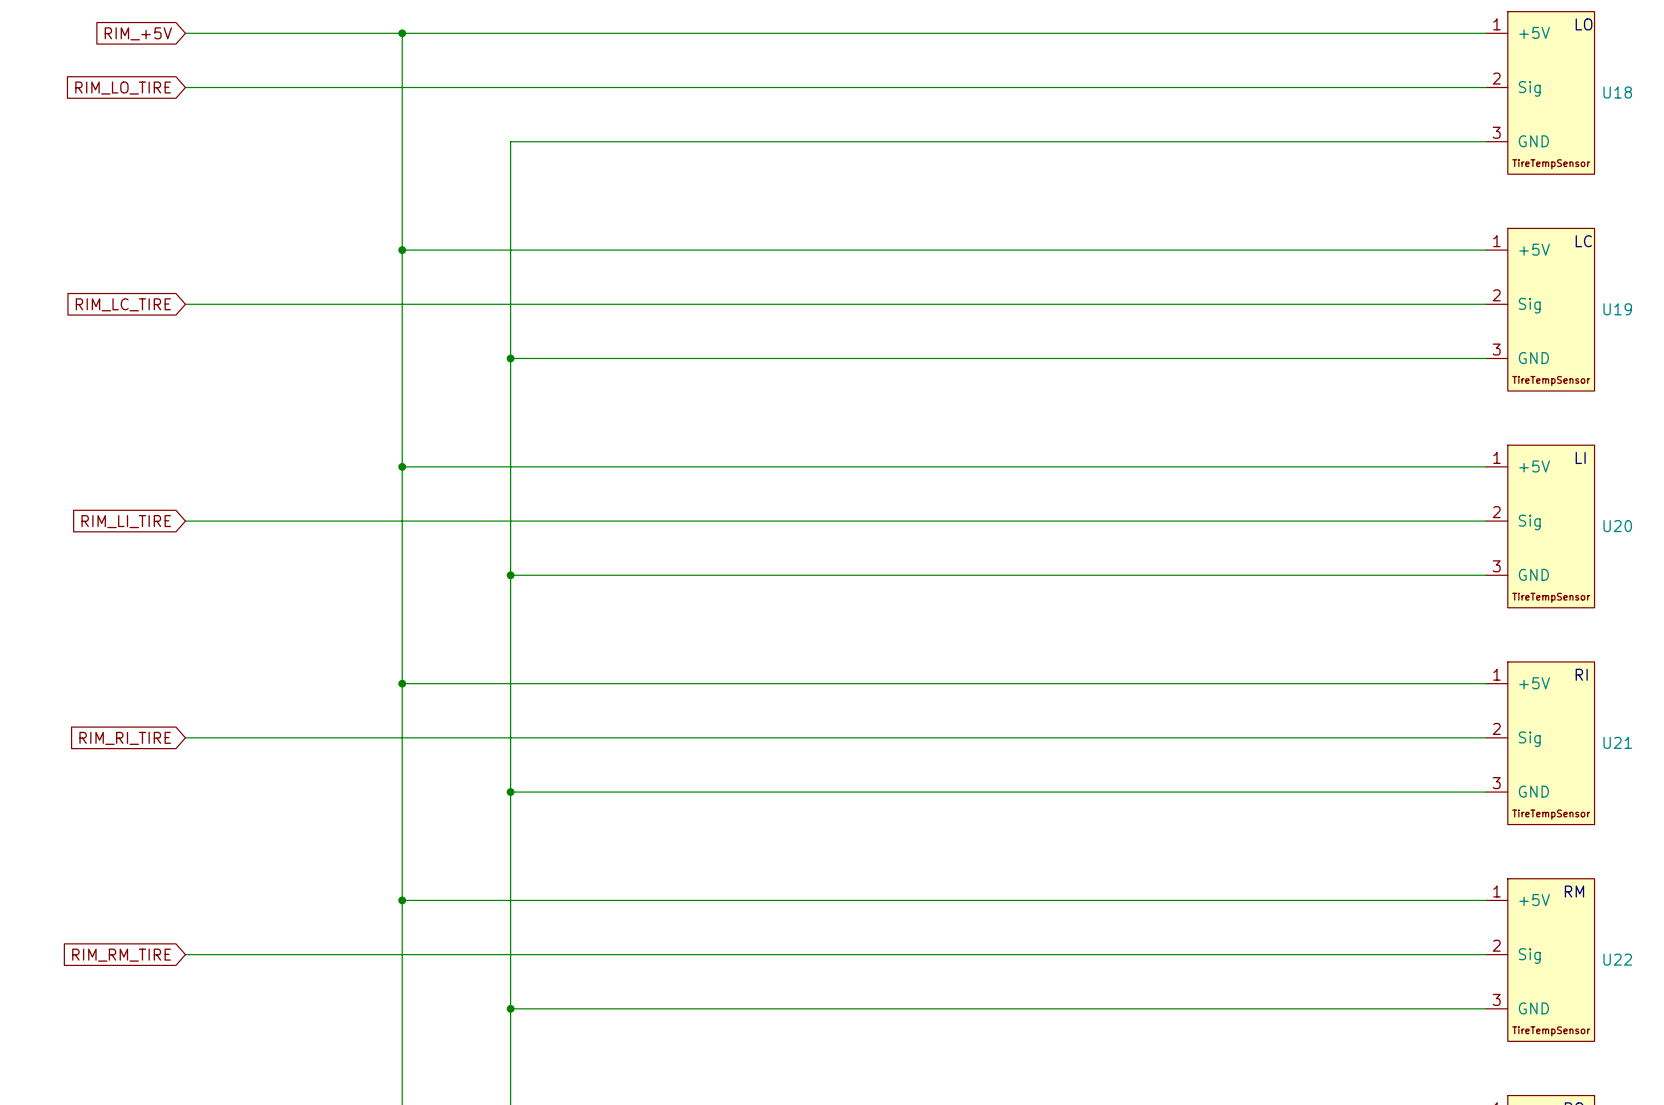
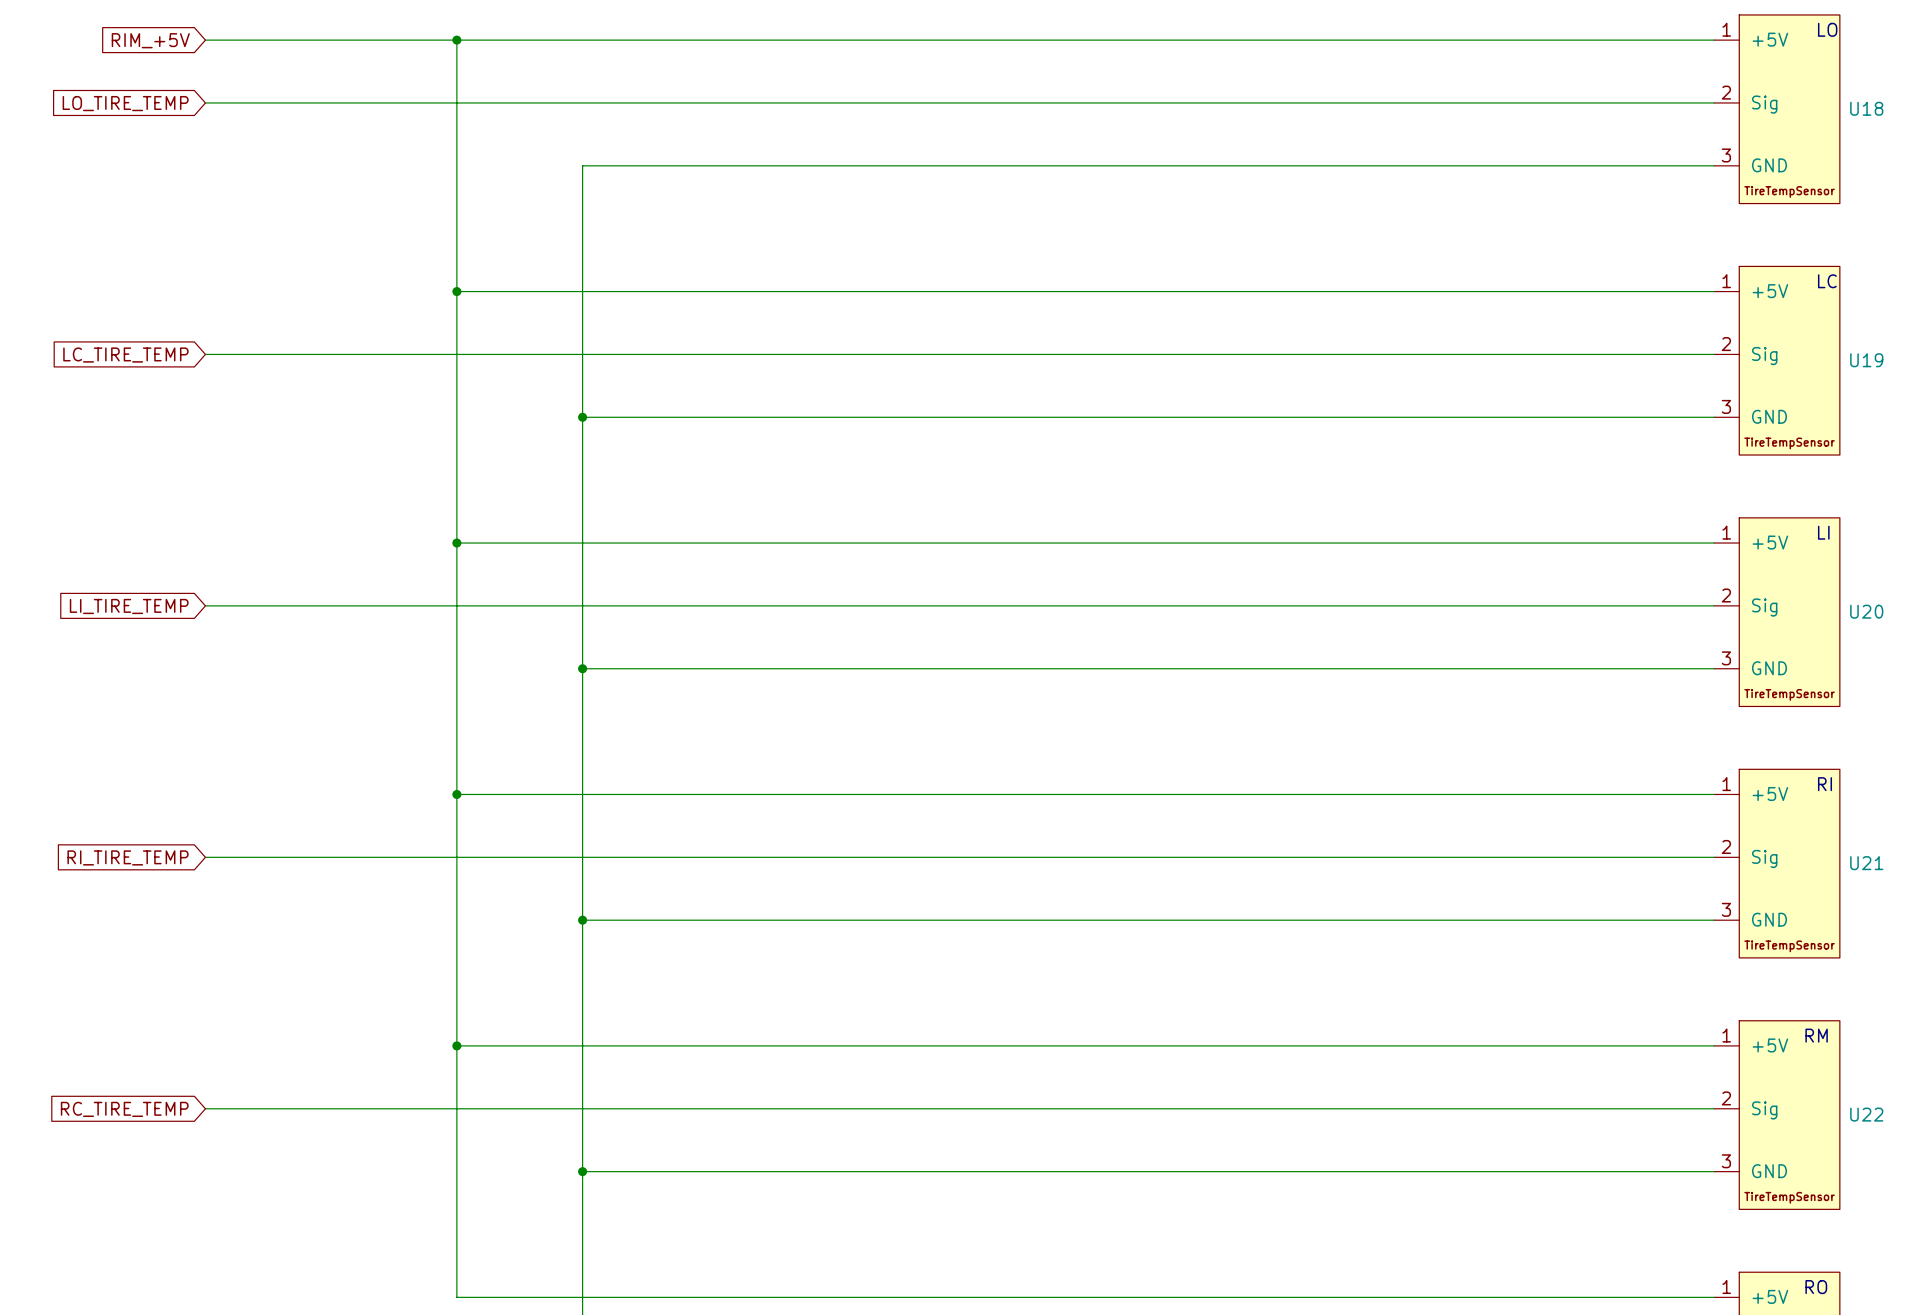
global label: RIM_LO_TIRE (123, 88) -> LO_TIRE_TEMP (125, 103)
global label: RIM_LC_TIRE (123, 304) -> LC_TIRE_TEMP (125, 355)
global label: RIM_LI_TIRE (126, 521) -> LI_TIRE_TEMP (129, 606)
global label: RIM_RI_TIRE (125, 738) -> RI_TIRE_TEMP (128, 857)
global label: RIM_RM_TIRE (121, 955) -> RC_TIRE_TEMP (124, 1109)

